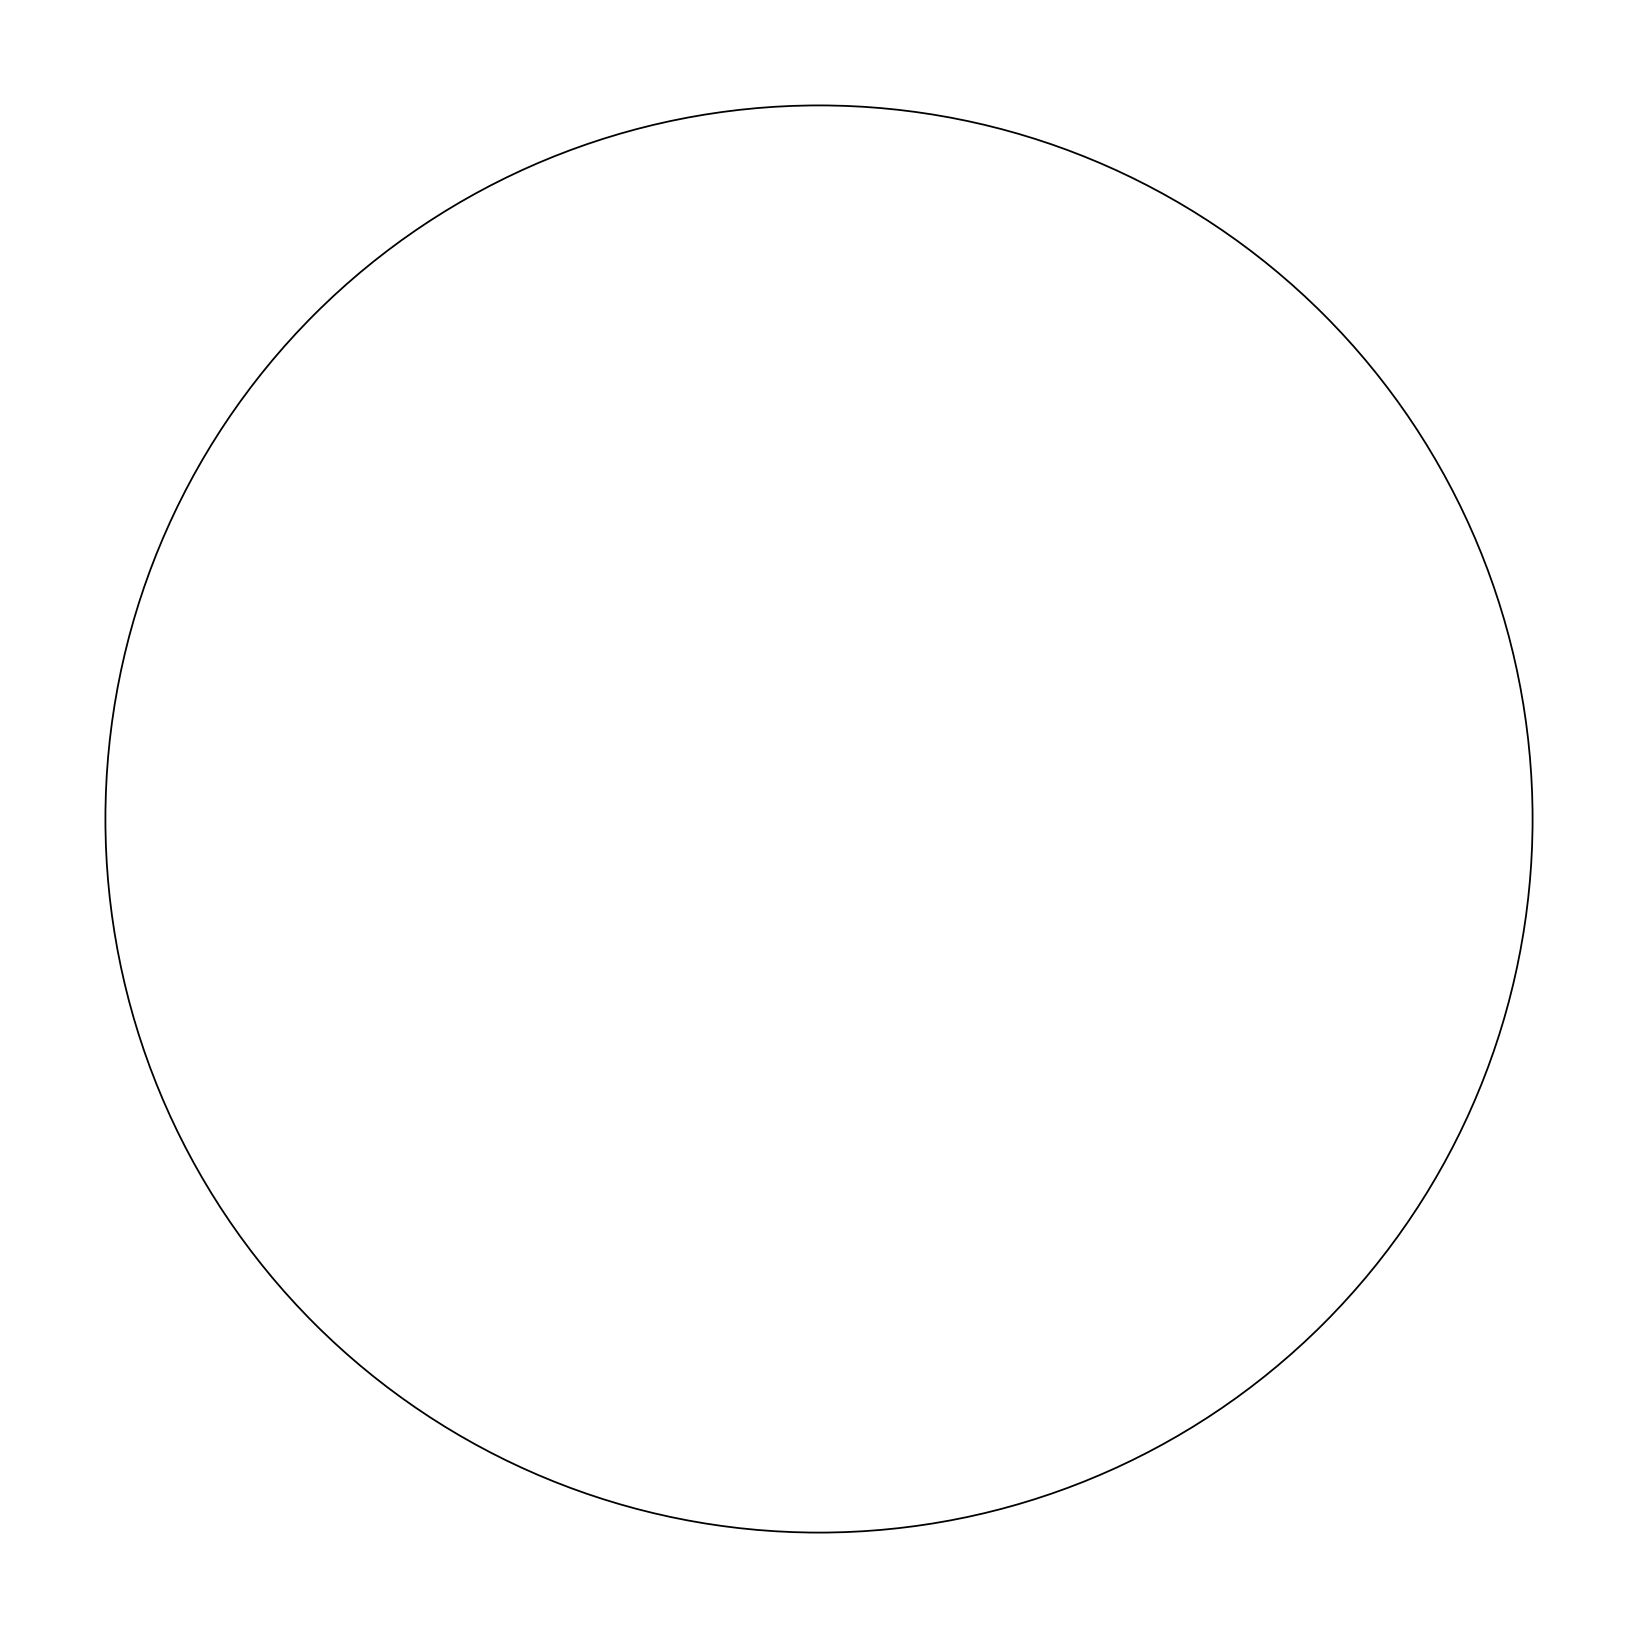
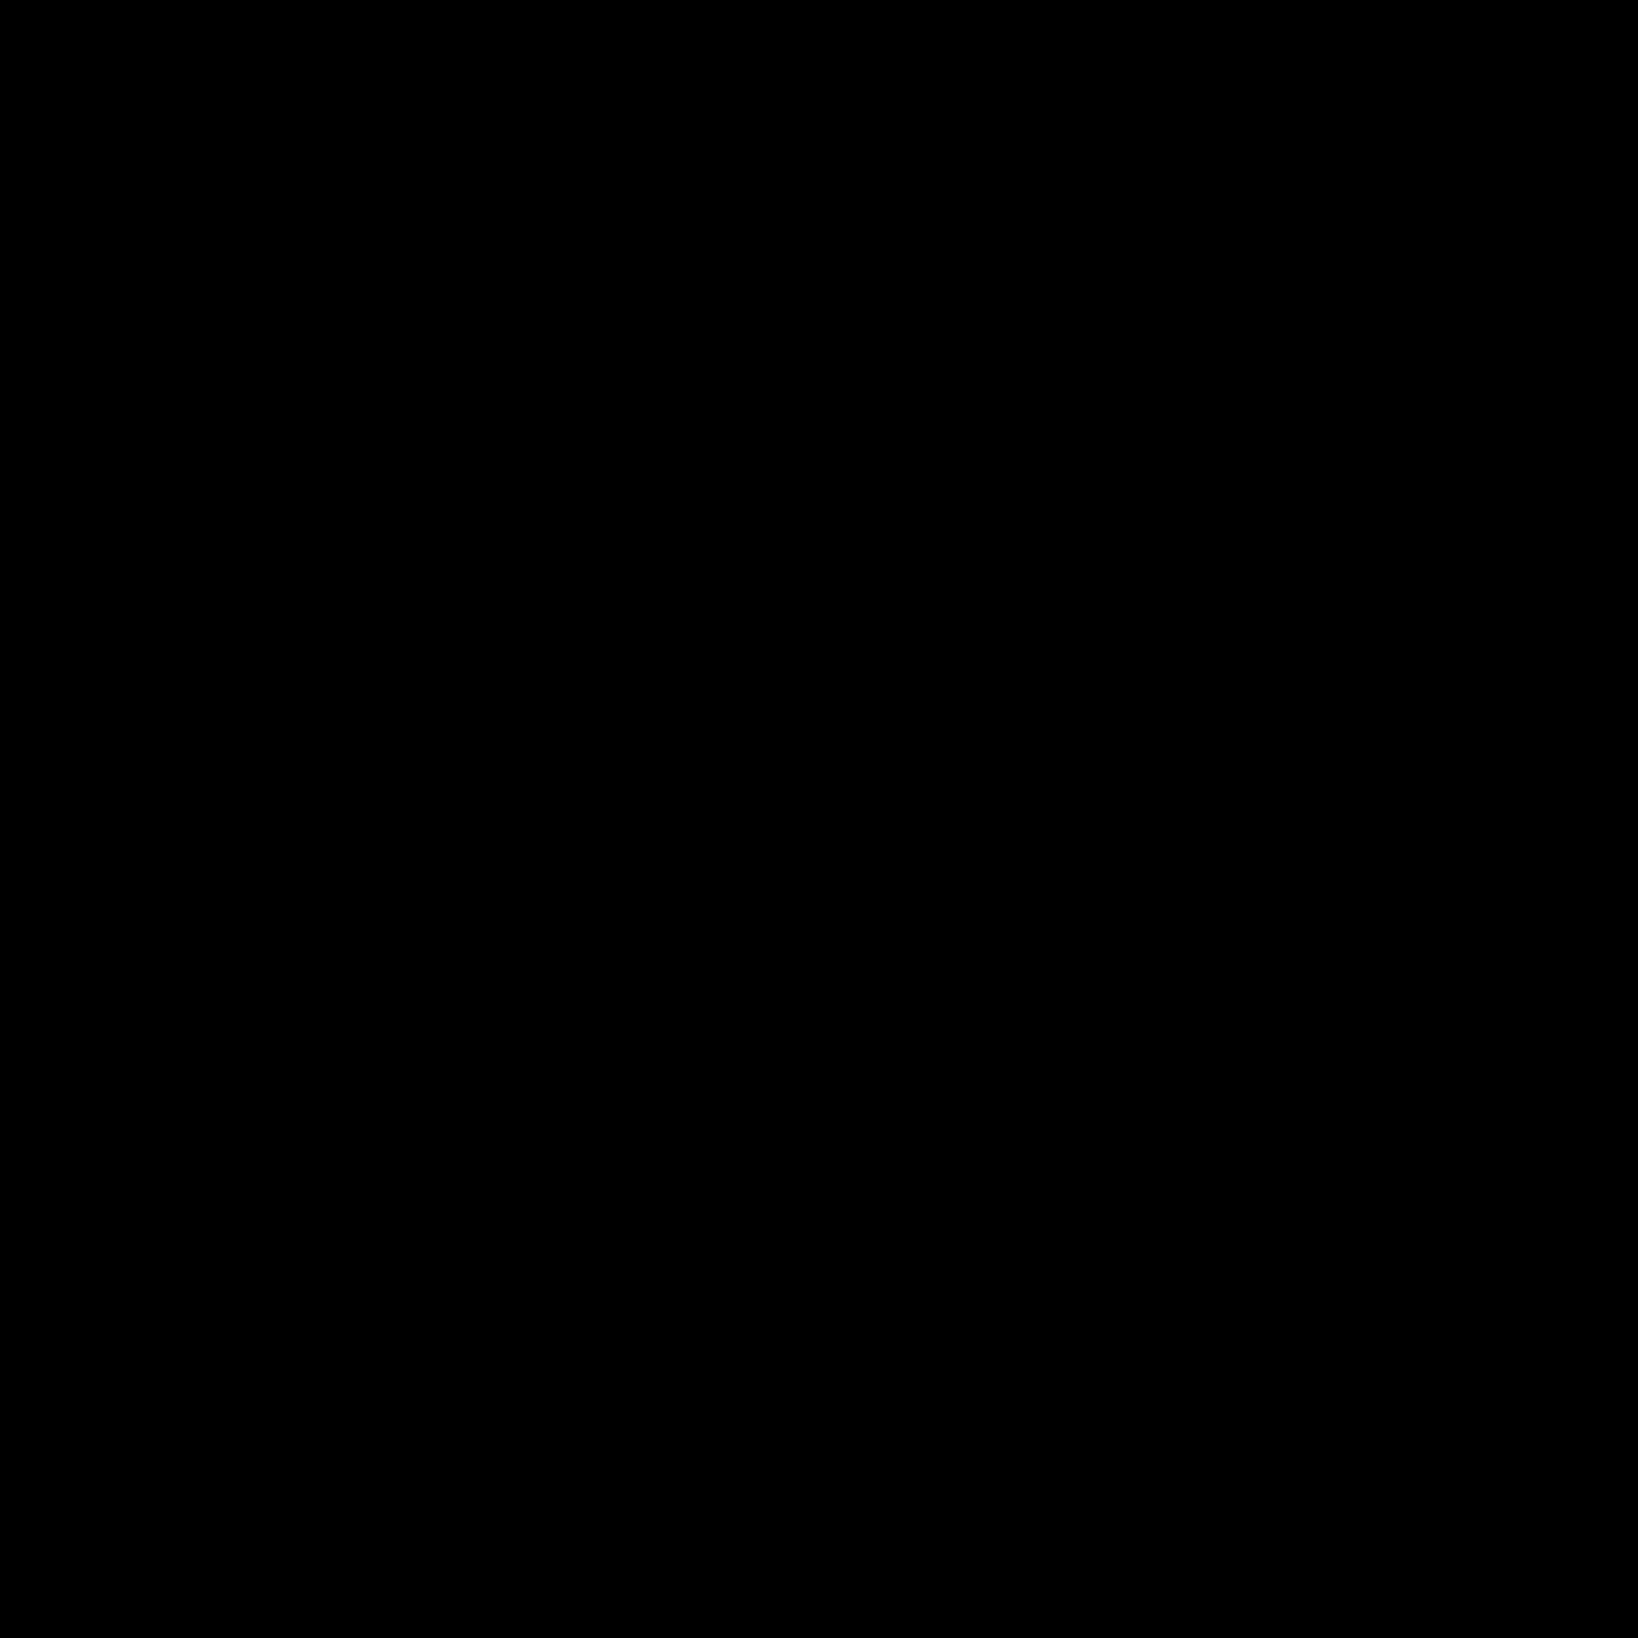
round board edge: [104, 104, 1534, 1534] -> none

